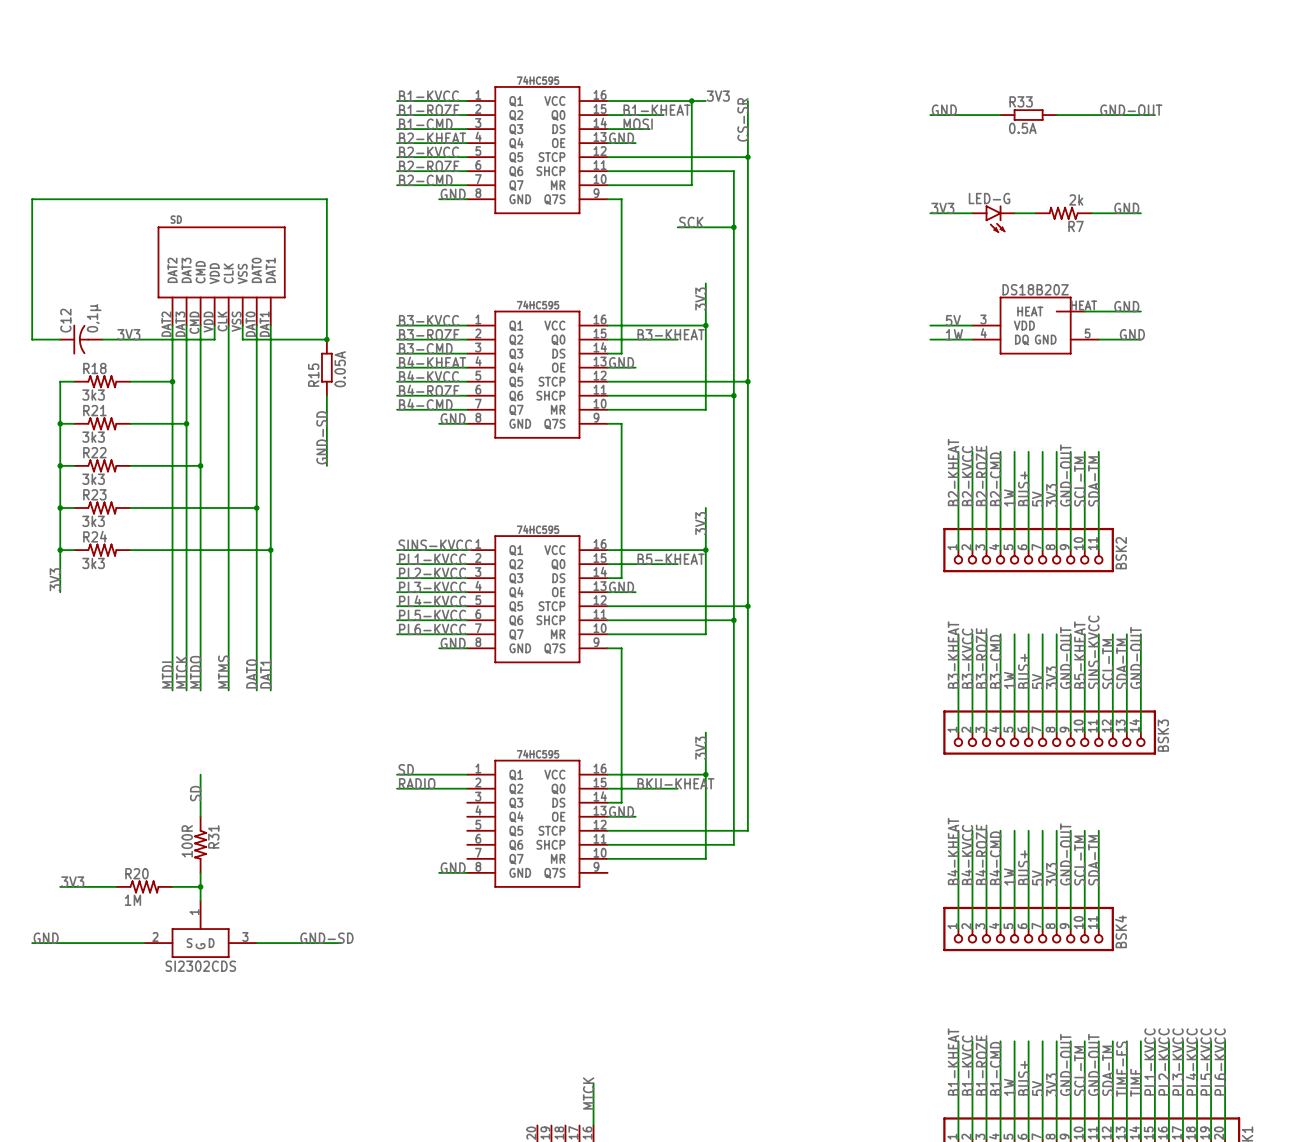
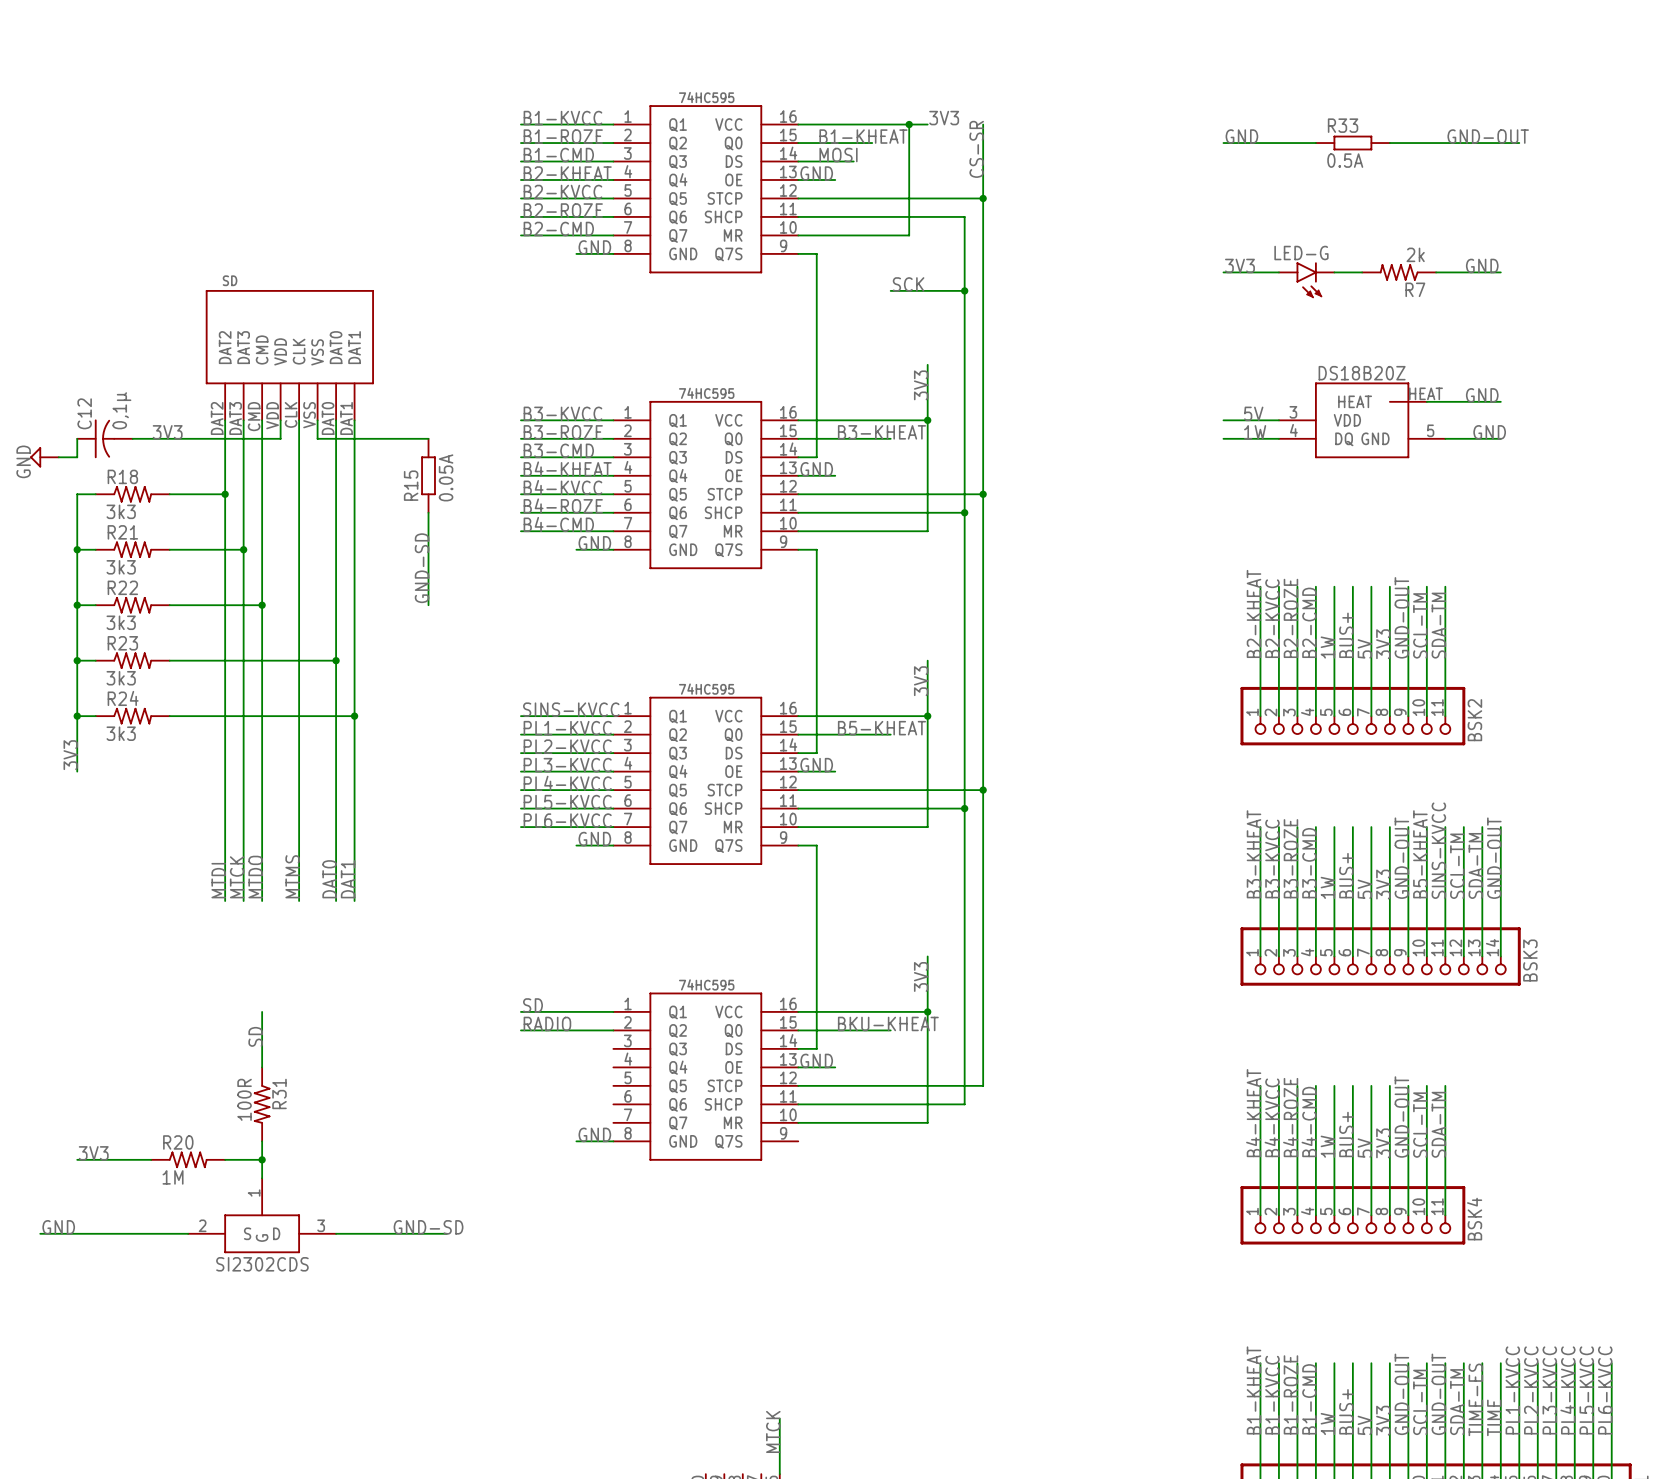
wire: (60, 339) (32, 339) (32, 199) (326, 199) (326, 339) -> (77, 438) (77, 457) (58, 457)
junction: (326, 339) -> none
power symbol: none -> GND (44, 457)

